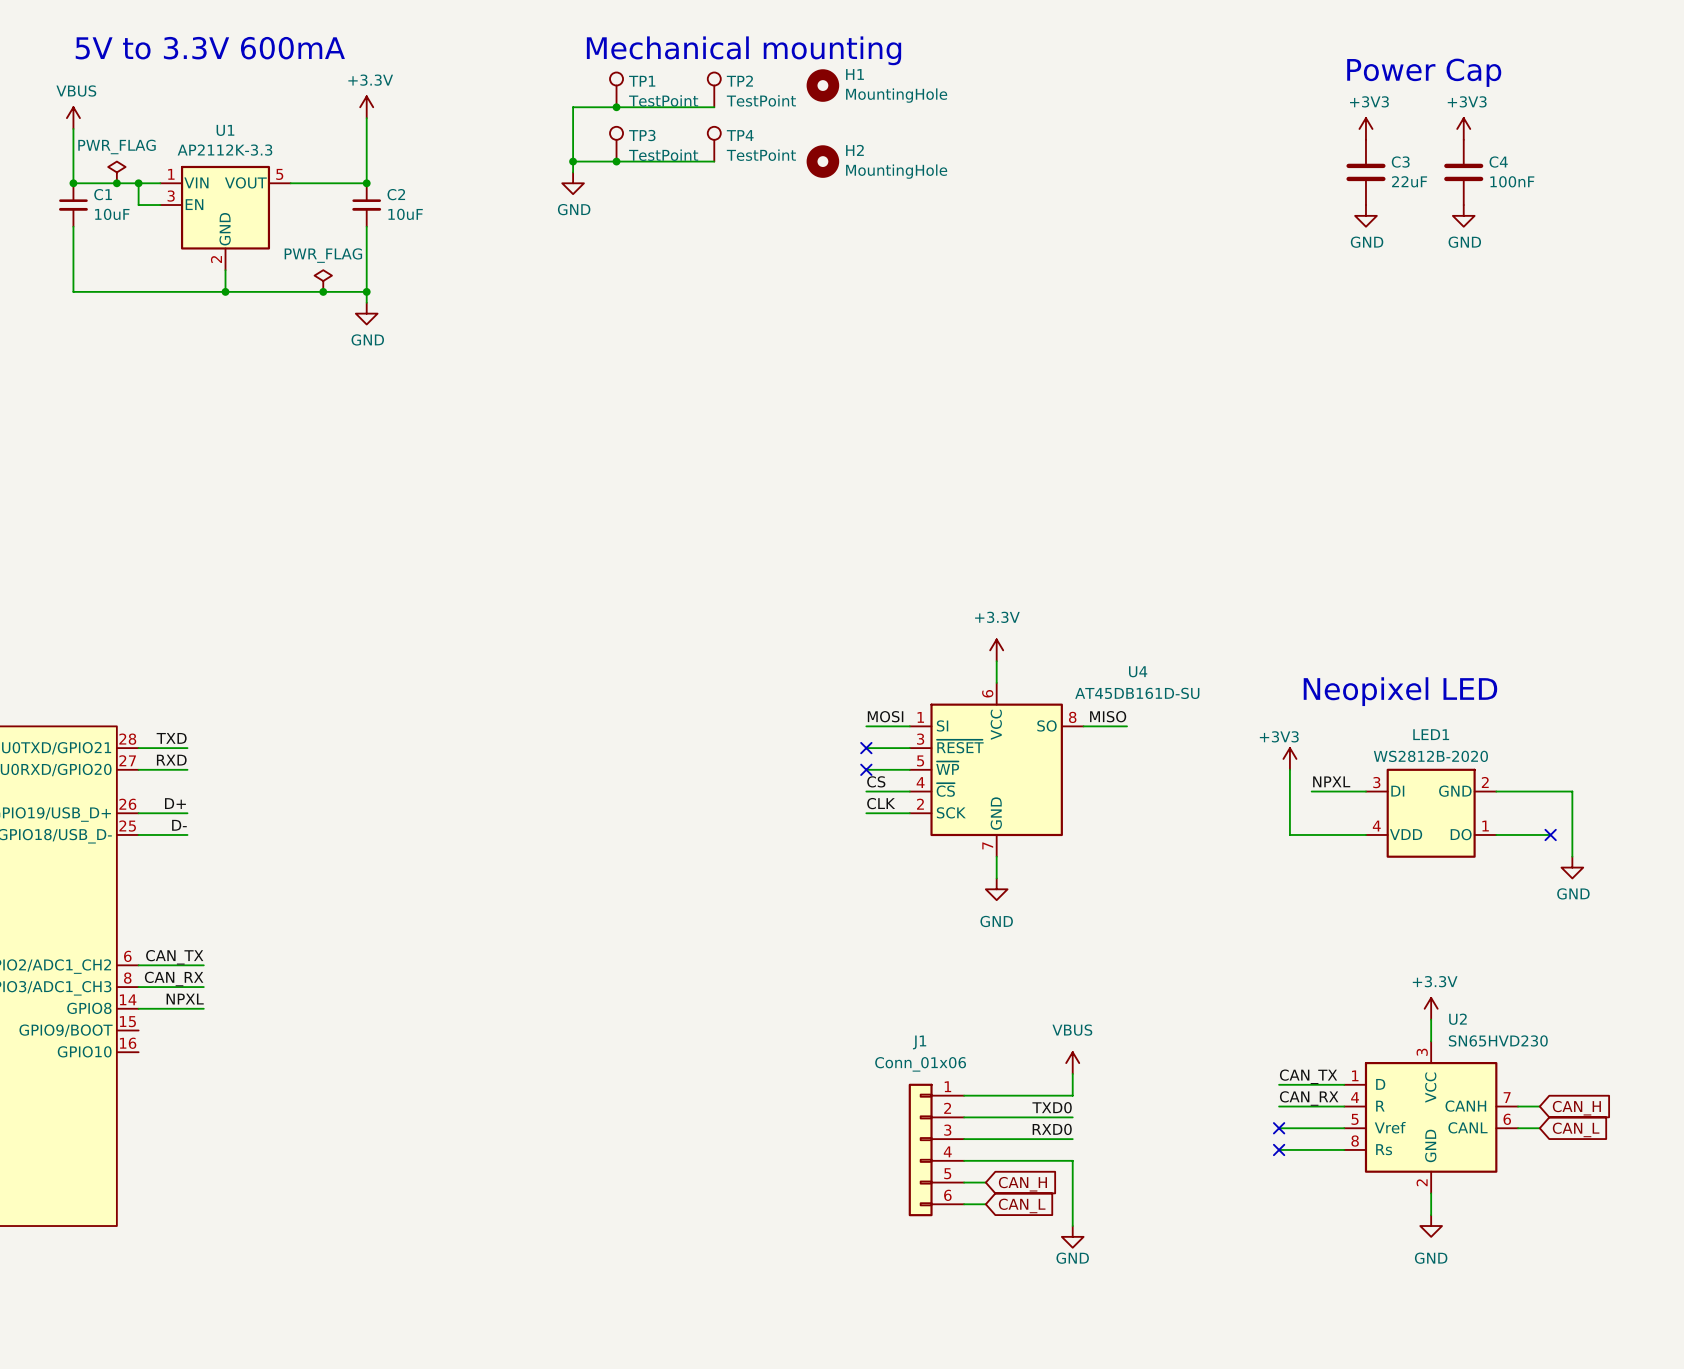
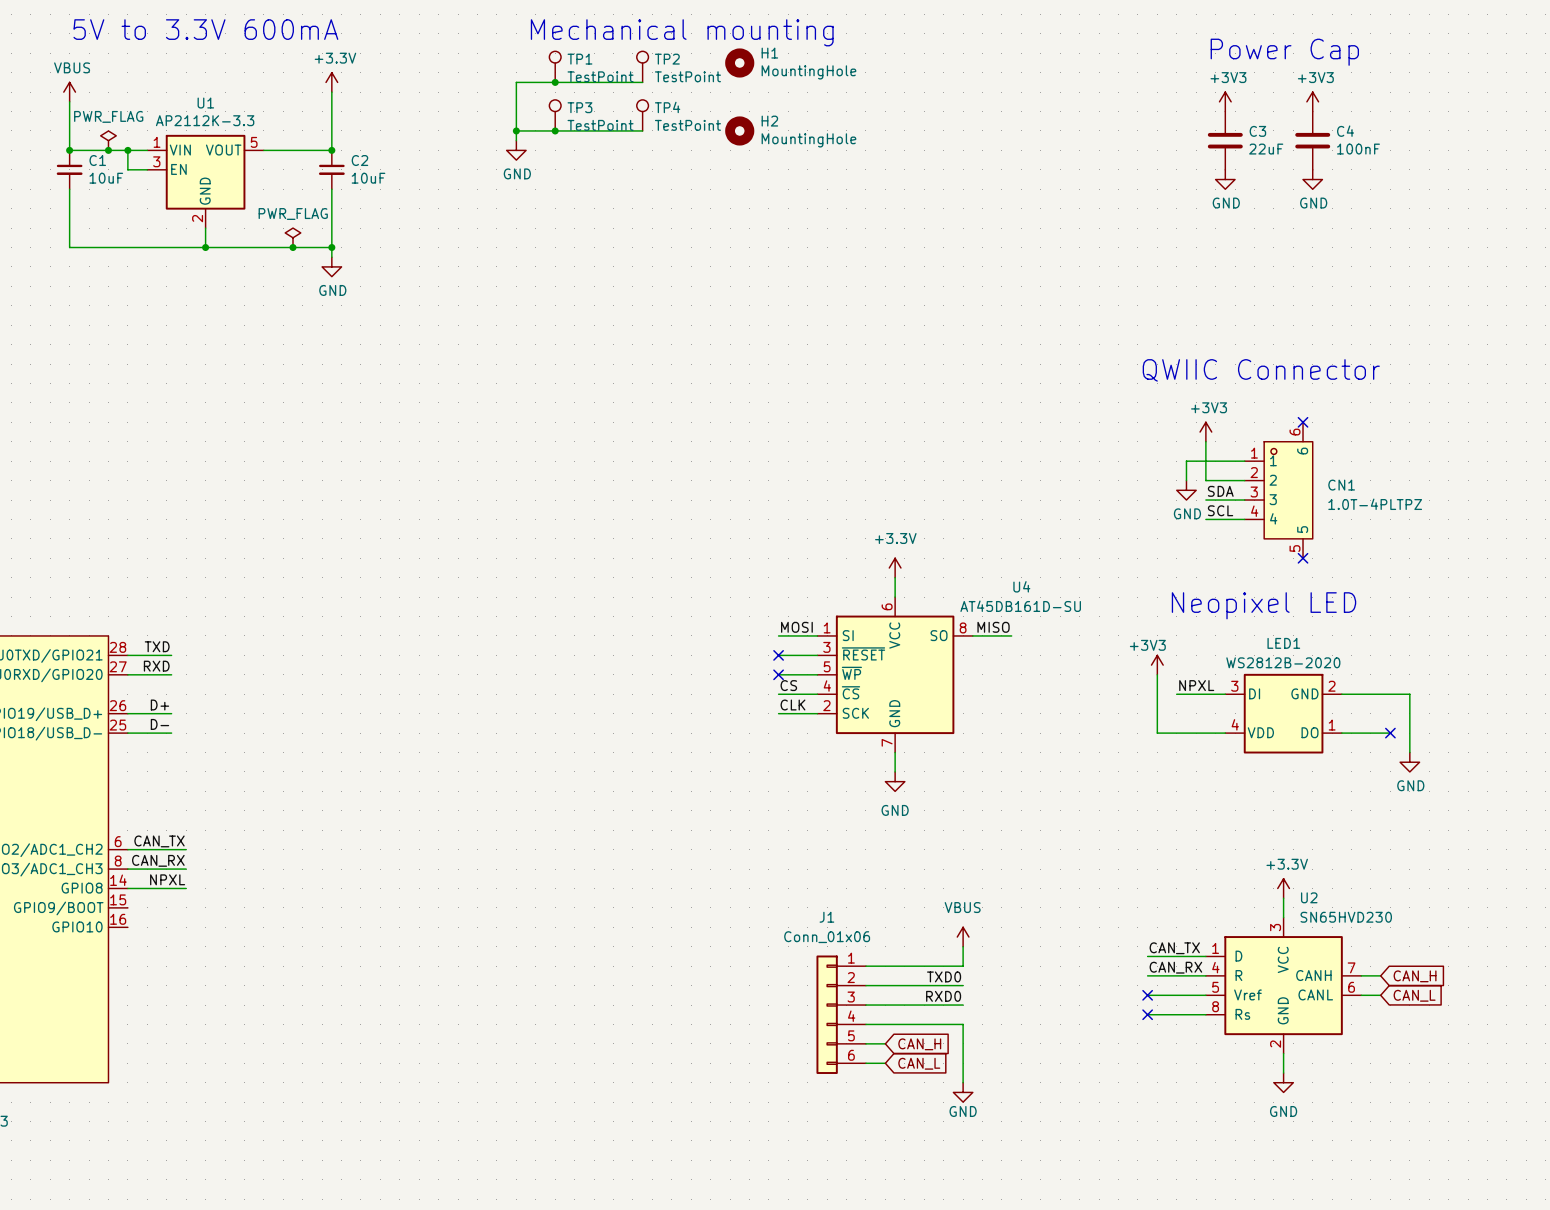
text: none -> QWIIC Connector (1261, 370)
no-connect mark: none -> (1303, 422)
power symbol: none -> +3V3 (1205, 432)
wire: none -> (1205, 441) (1205, 480) (1244, 480)
wire: none -> (1244, 461) (1186, 461) (1186, 480)
power symbol: none -> GND (1186, 490)
CN1: none -> 1.0T-4PLTPZ (1278, 490)
label: none -> SDA (1220, 491)
wire: none -> (1205, 500) (1244, 500)
label: none -> SCL (1220, 510)
wire: none -> (1205, 519) (1244, 519)
no-connect mark: none -> (1303, 558)

